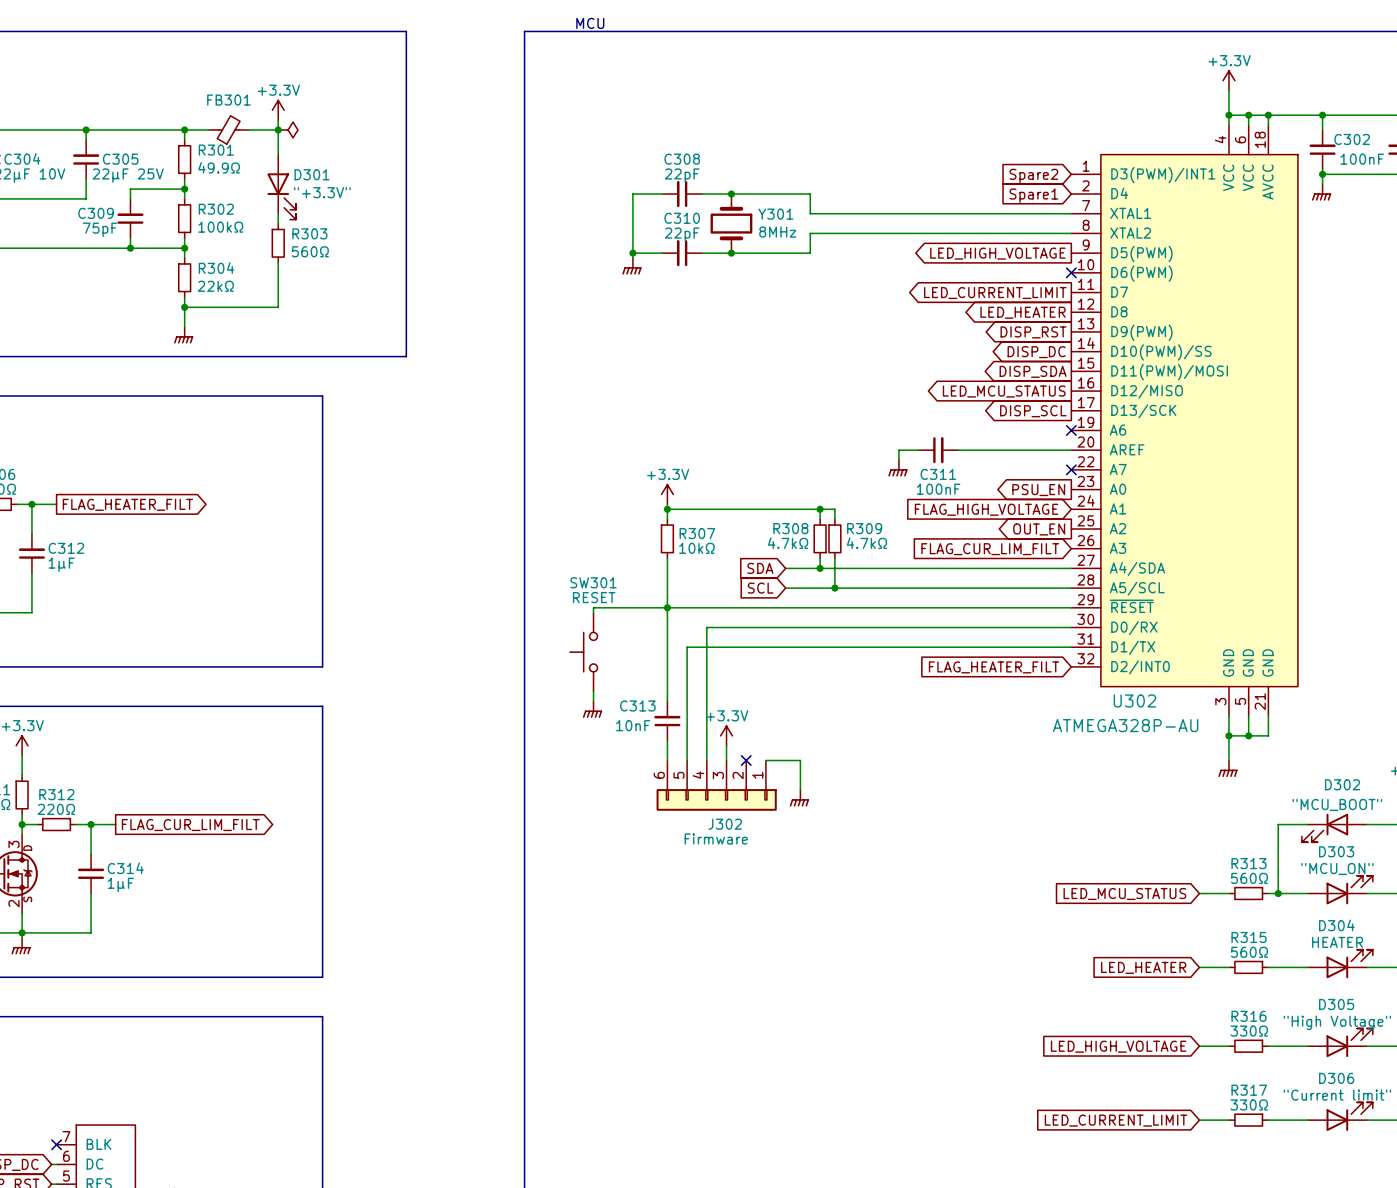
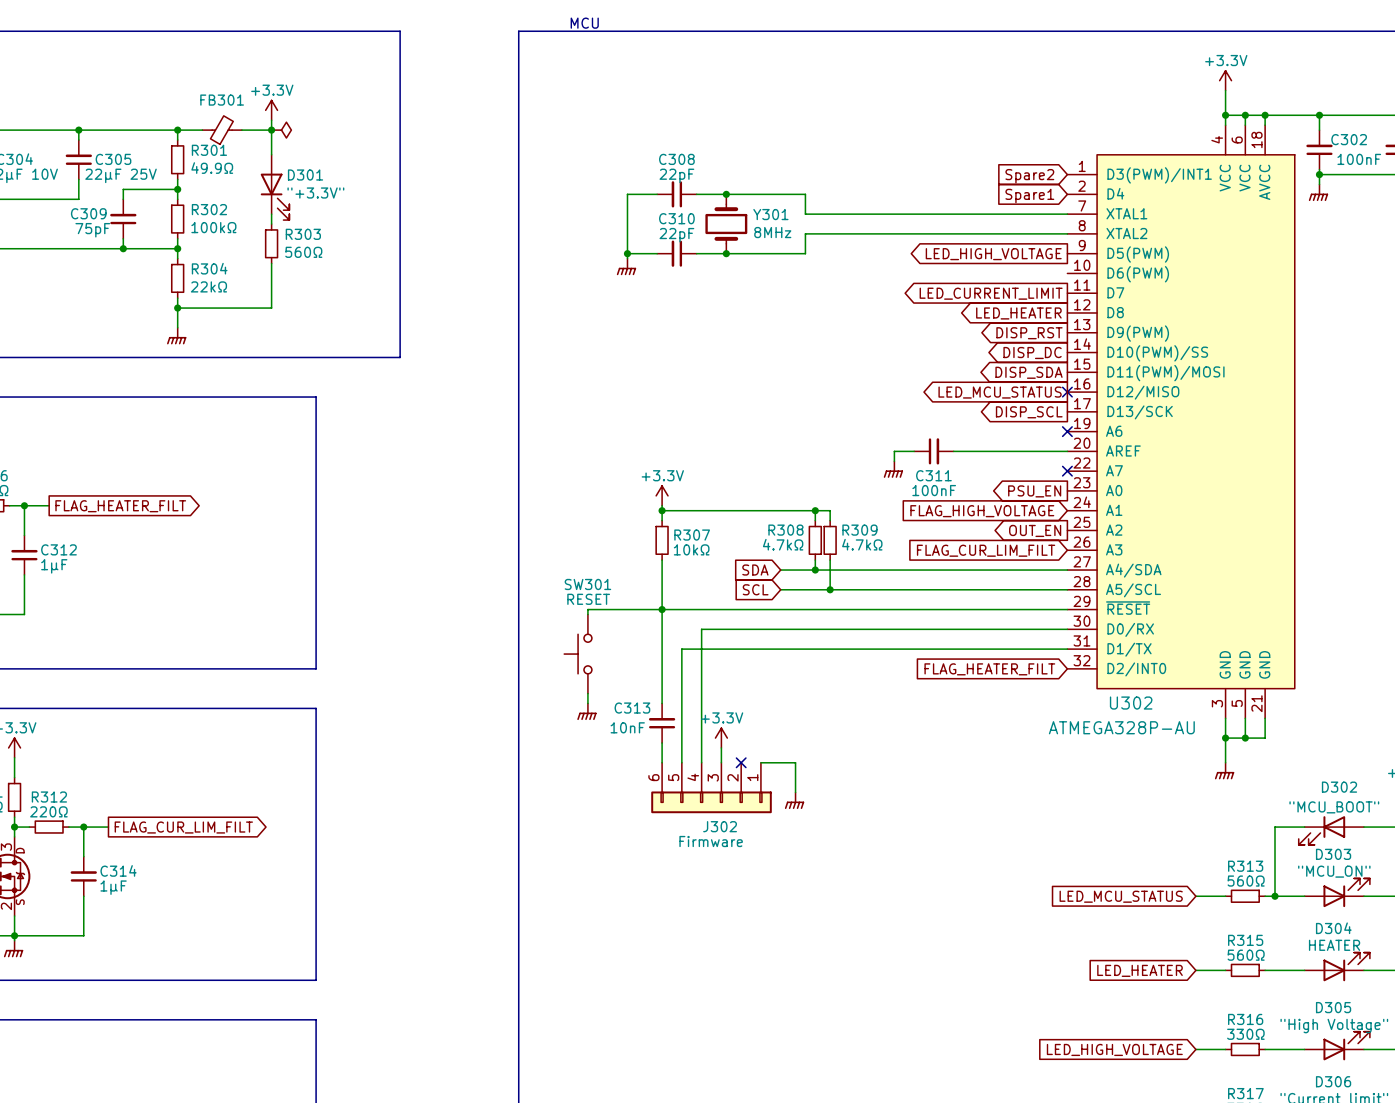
no-connect mark: (1071, 272) -> none
no-connect mark: none -> (1067, 392)

